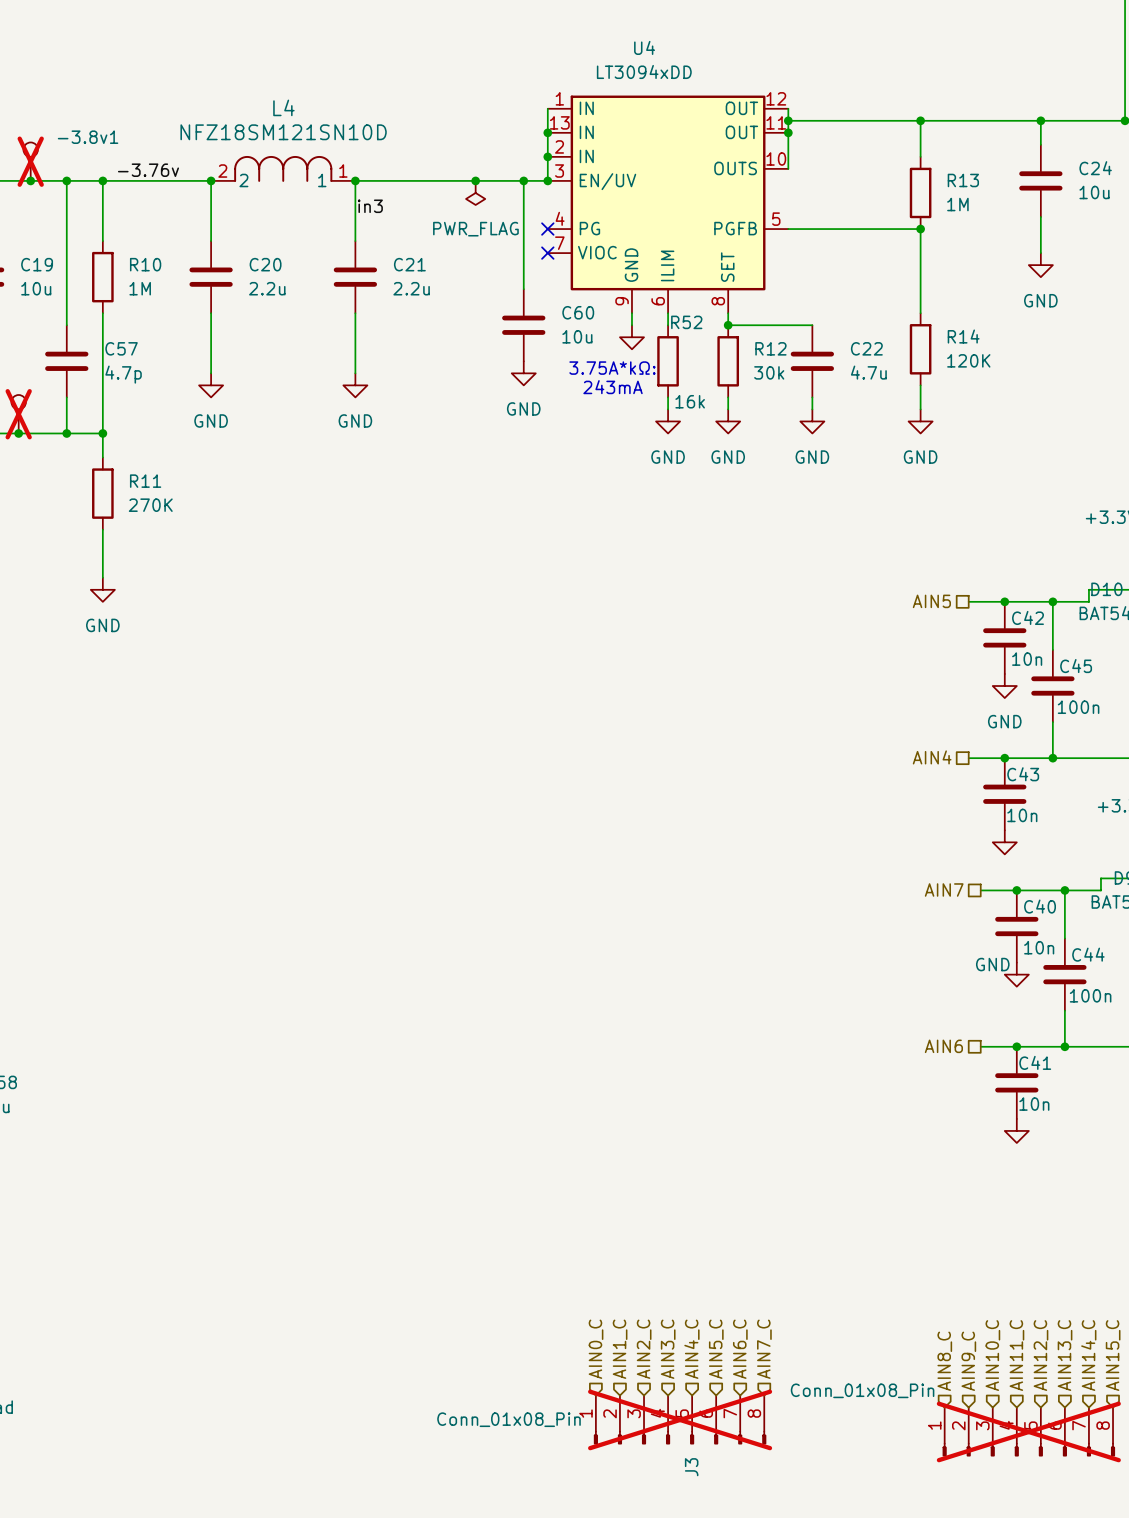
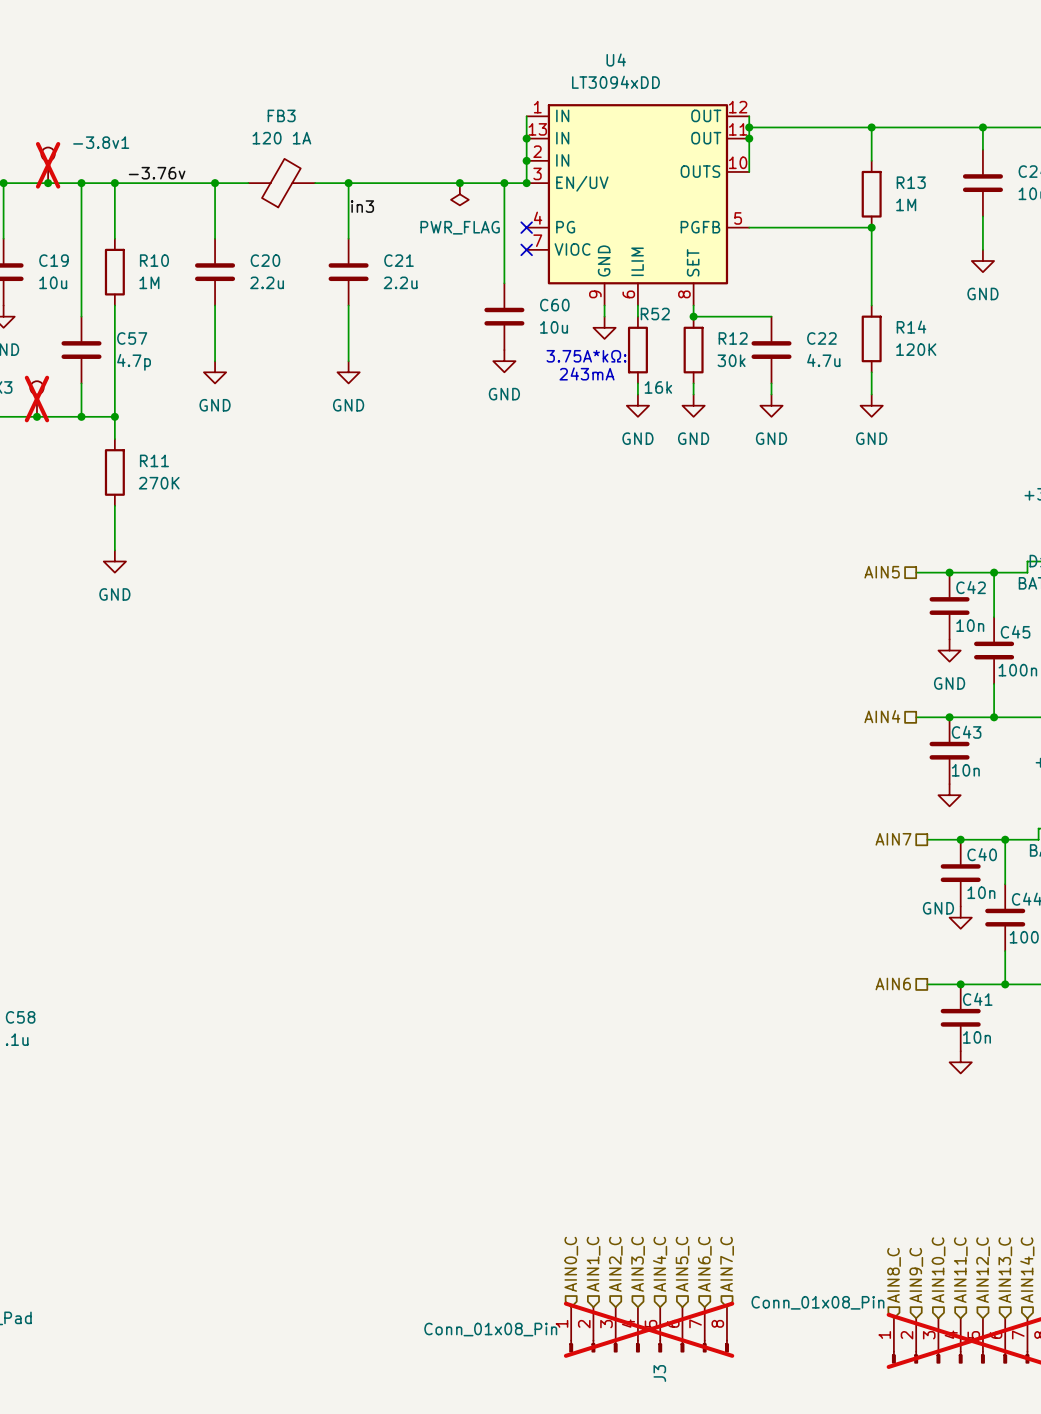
L4: NFZ18SM121SN10D (283, 168) -> none
FB3: none -> 120 1A (281, 183)

